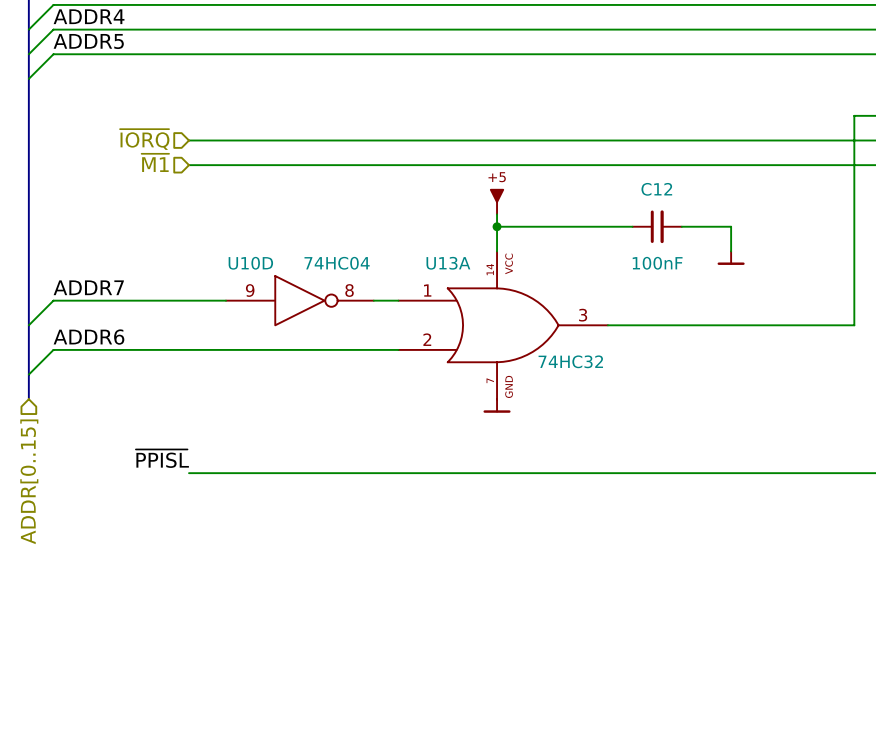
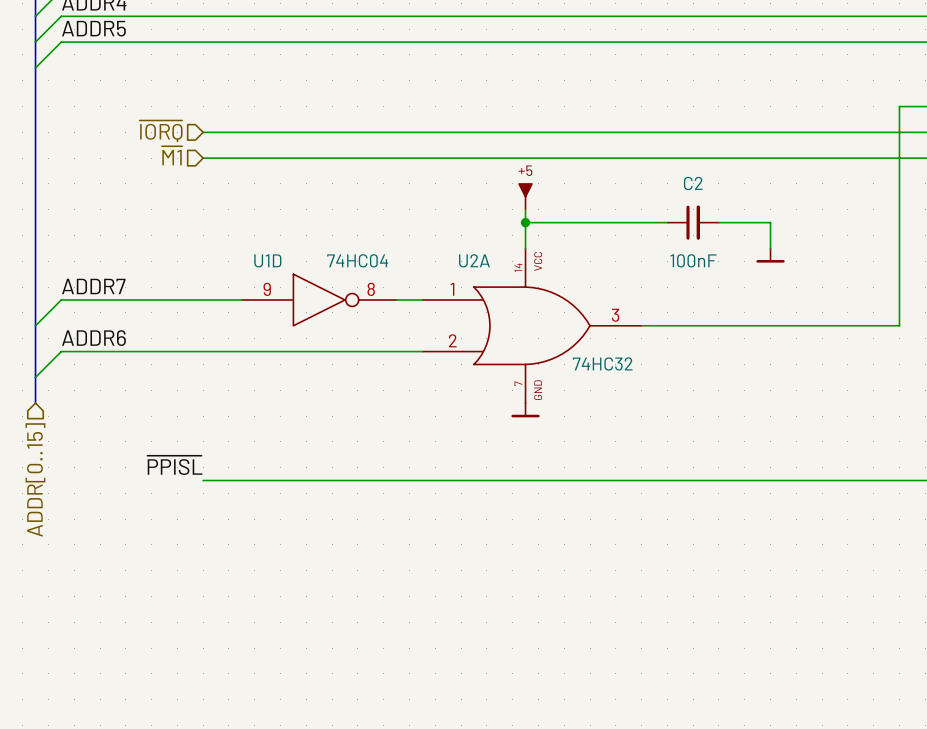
C12 name: C12 (656, 189) -> C2 (693, 183)
U10D name: U10D (250, 263) -> U1D (267, 260)
U13A name: U13A (448, 263) -> U2A (474, 260)

